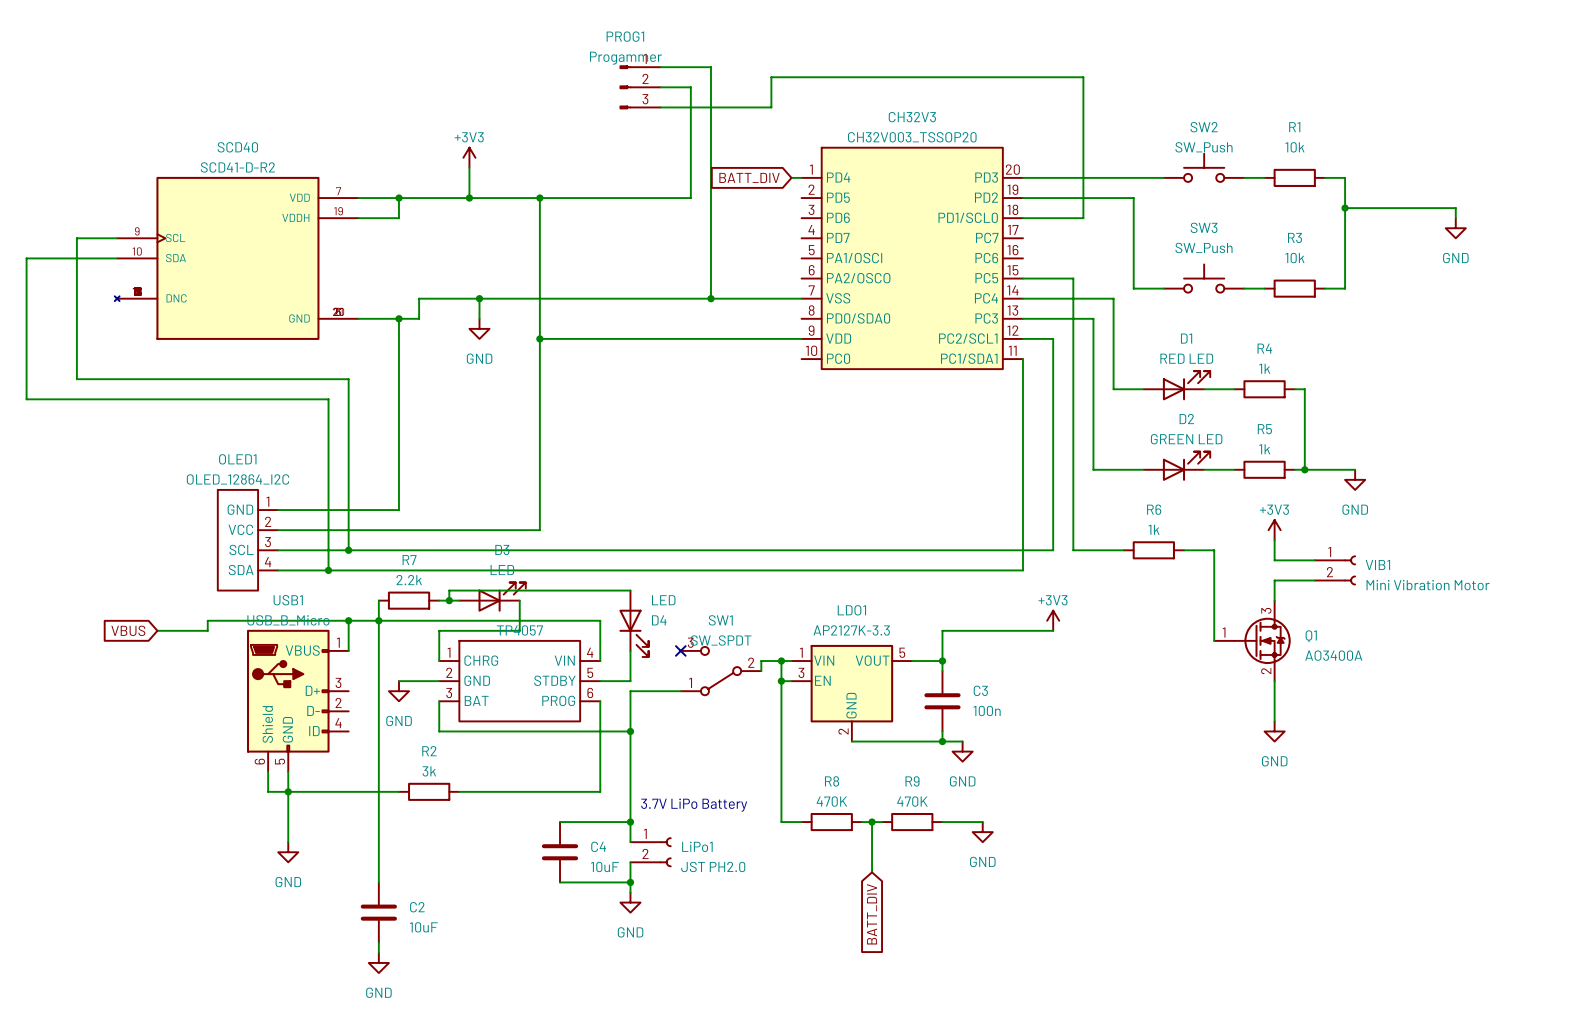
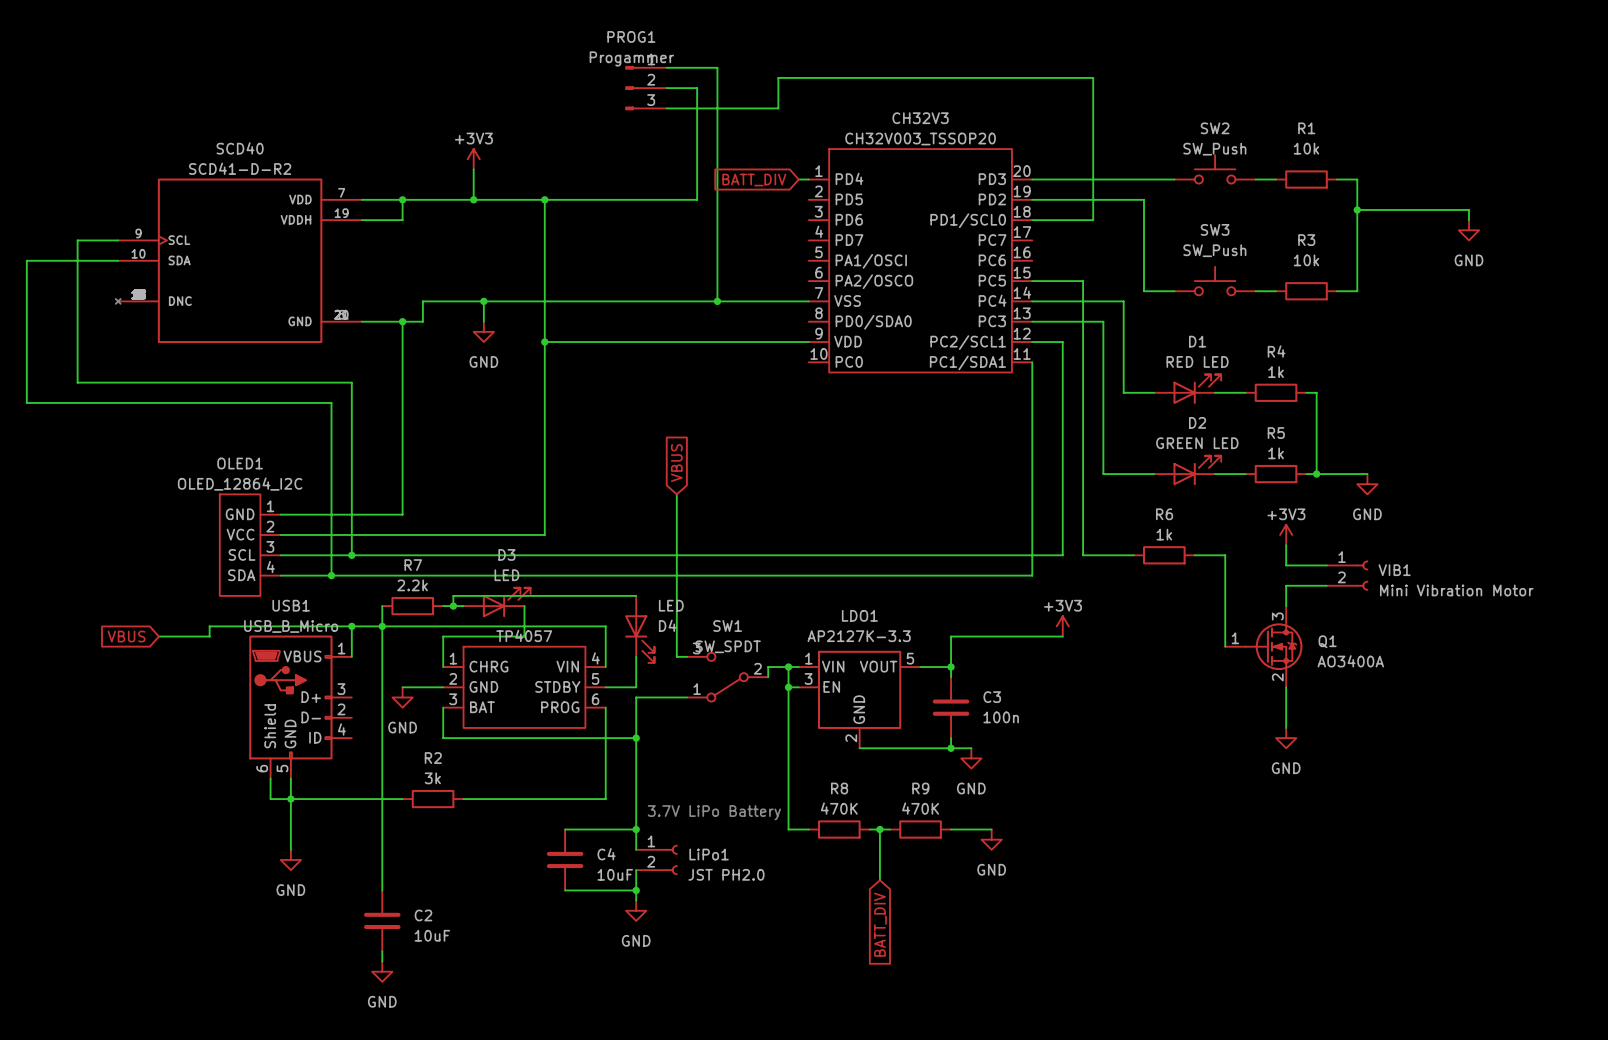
global label: none -> VBUS (676, 463)
wire: none -> (676, 494) (676, 656) (686, 656)
no-connect mark: (680, 650) -> none

